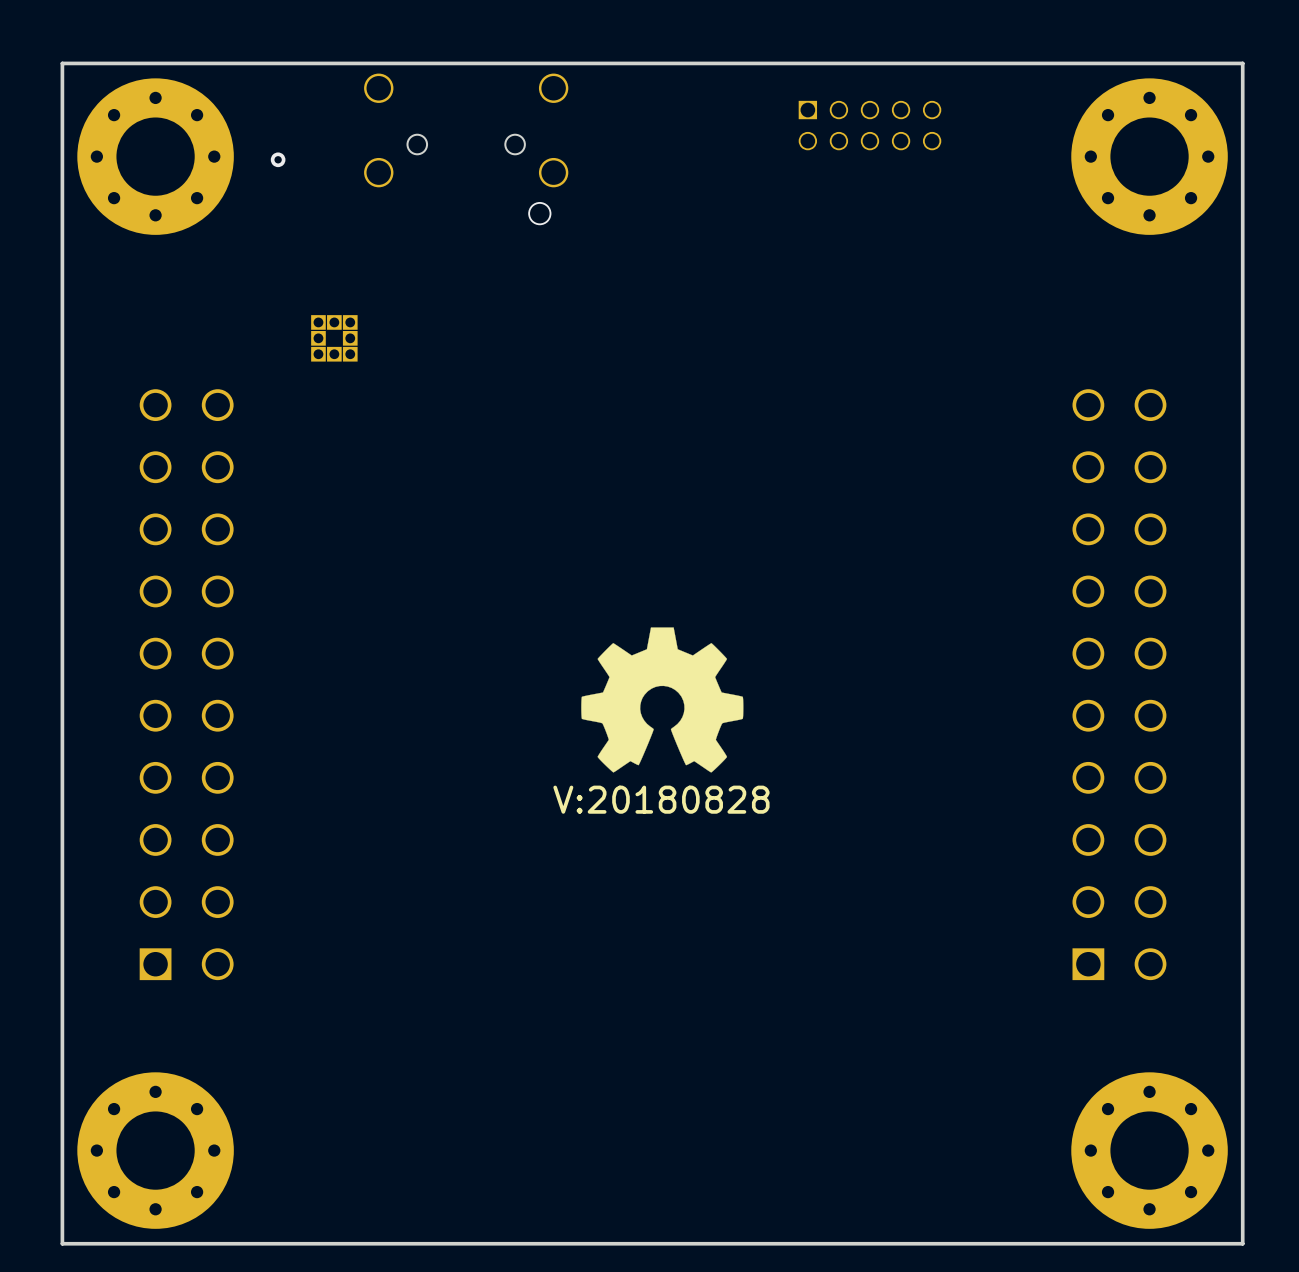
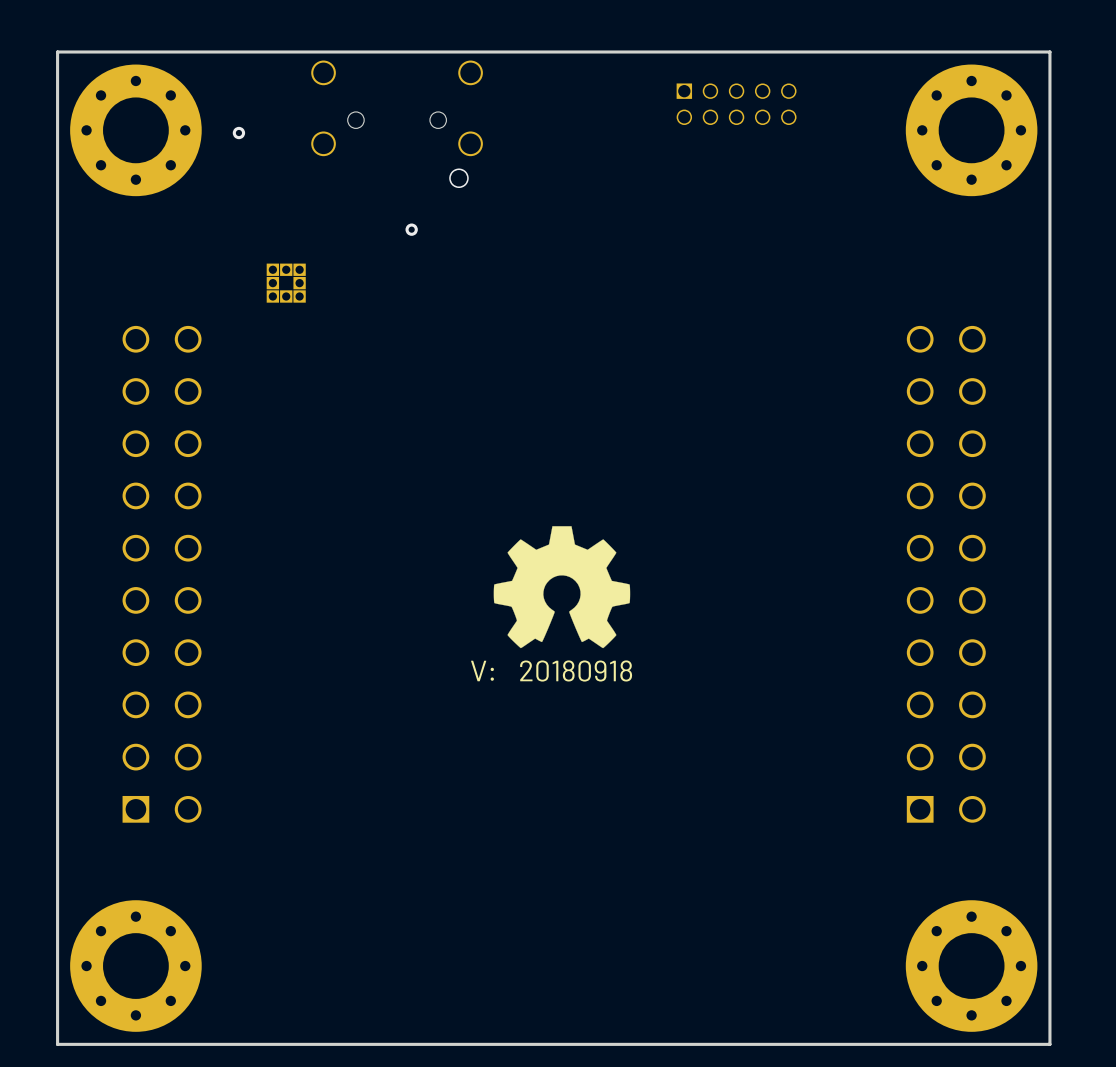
via: none -> (411, 229)
drawing shape: [553, 785, 770, 814] -> [471, 660, 633, 682]

